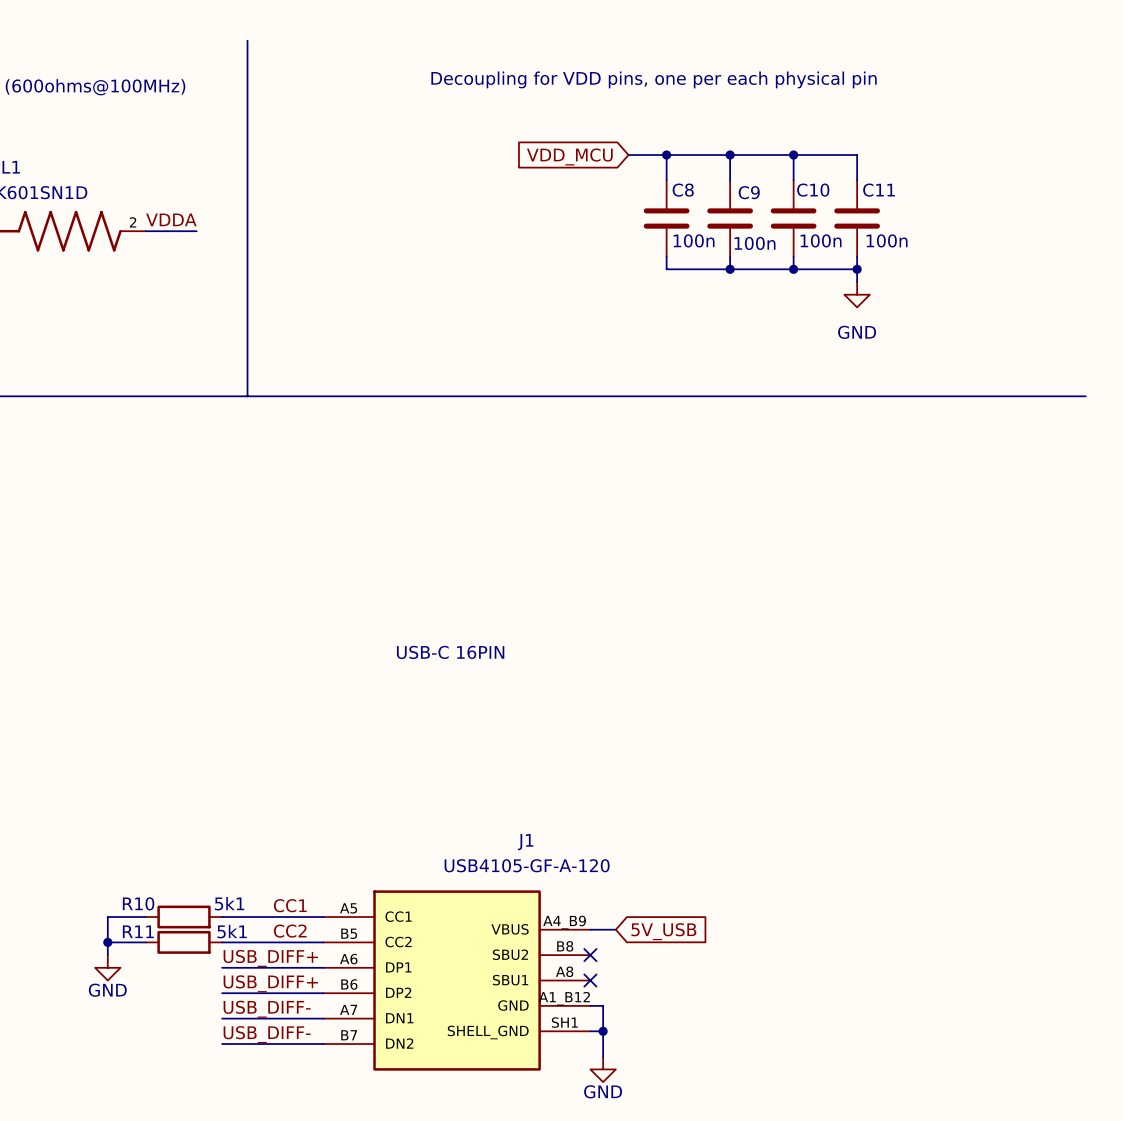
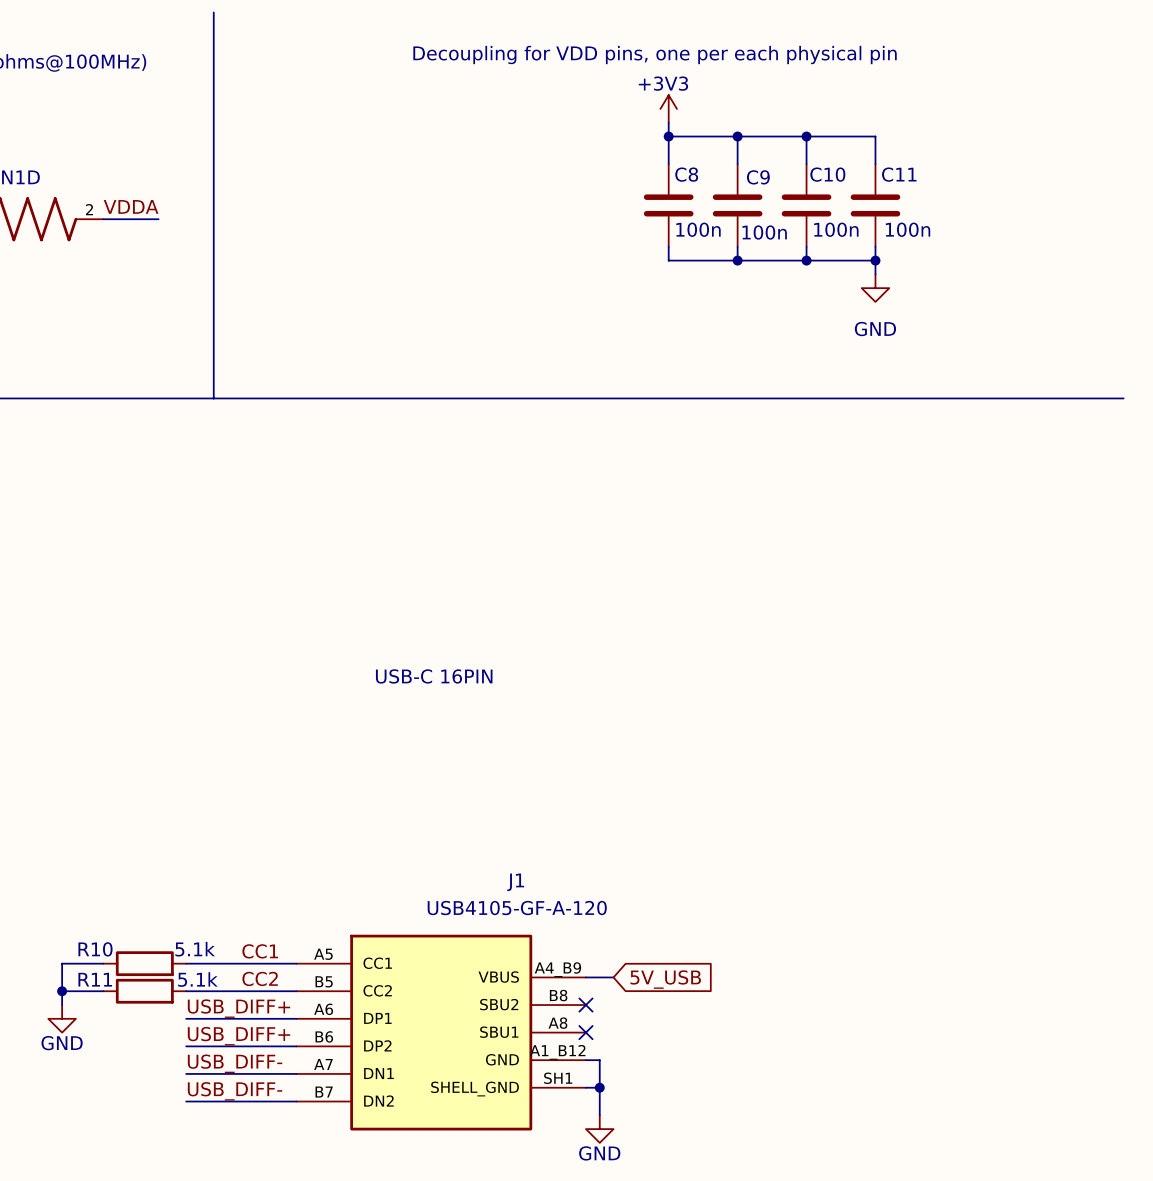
power symbol: none -> +3V3 (668, 108)
wire: (628, 155) (666, 155) -> (668, 122) (668, 136)
global label: VDD_MCU (569, 156) -> none
R10 value: 5k1 (229, 903) -> 5.1k (195, 949)
R11 value: 5k1 (232, 931) -> 5.1k (197, 979)

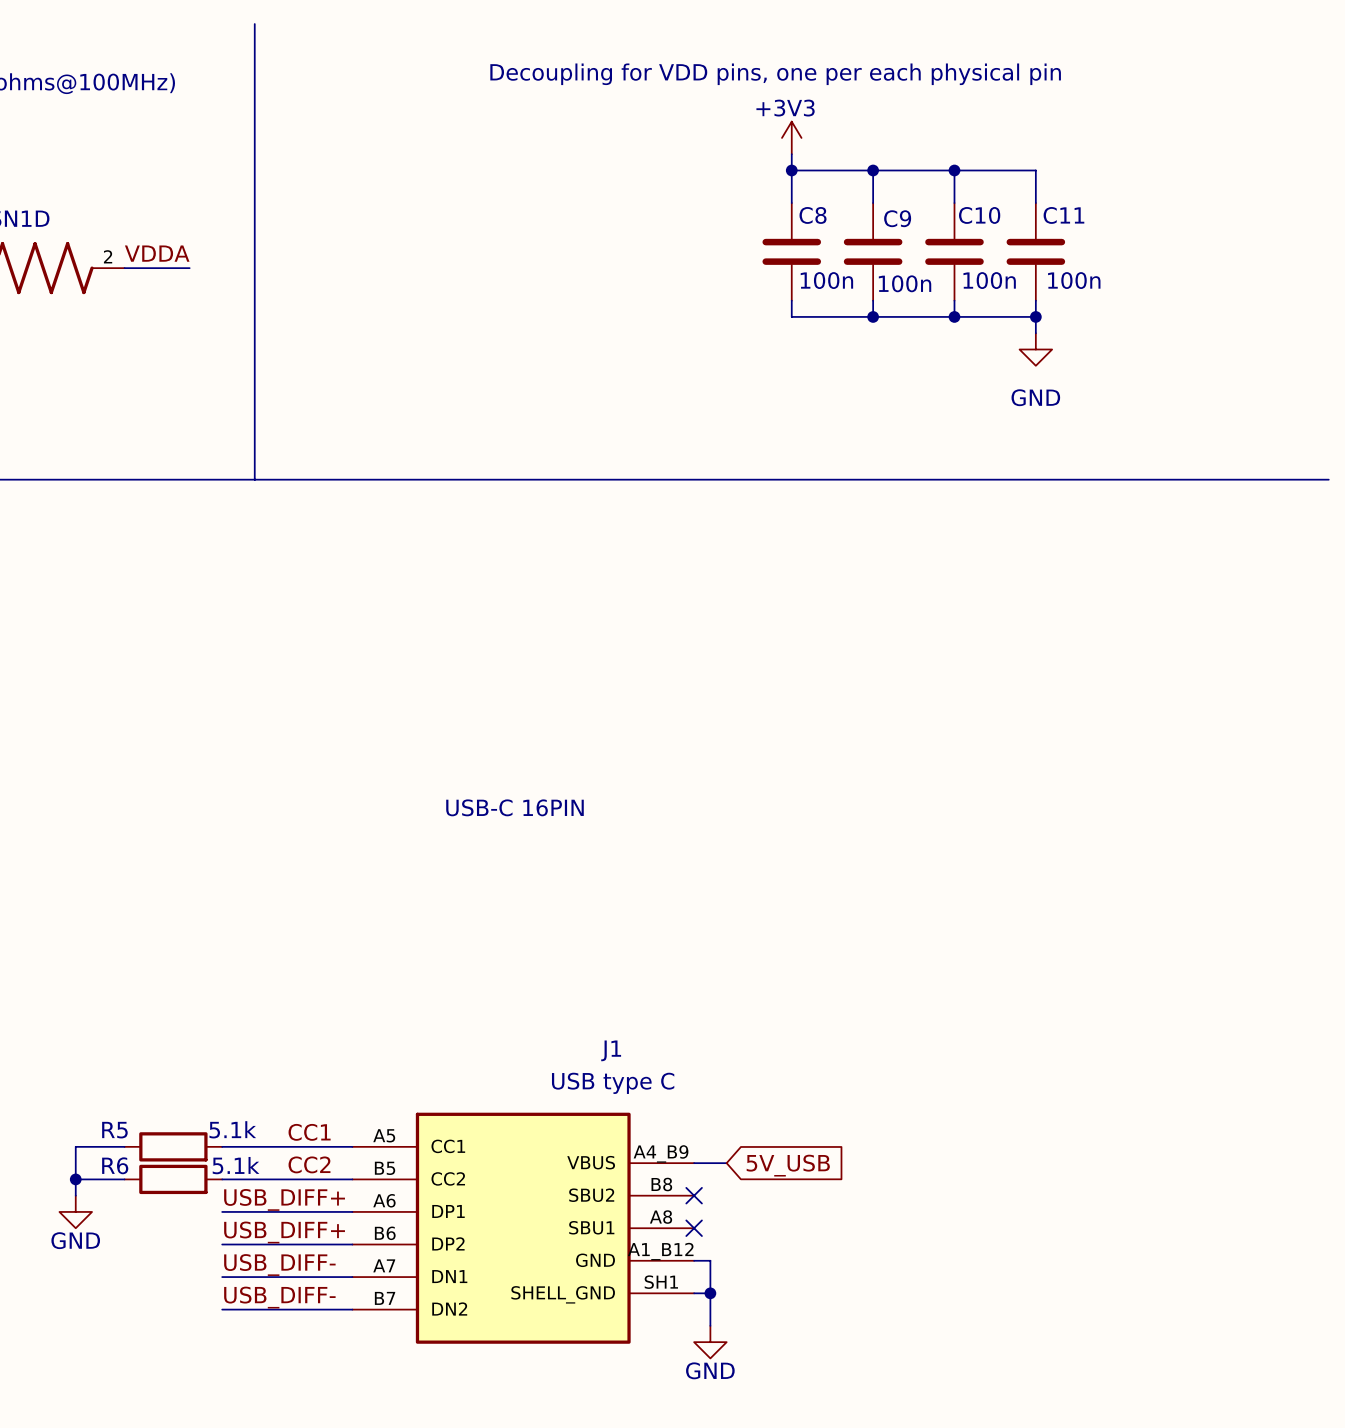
J1 value: USB4105-GF-A-120 (517, 908) -> USB type C (613, 1083)
R10 name: R10 (95, 949) -> R5 (114, 1130)
R11 name: R11 (95, 979) -> R6 (115, 1165)

